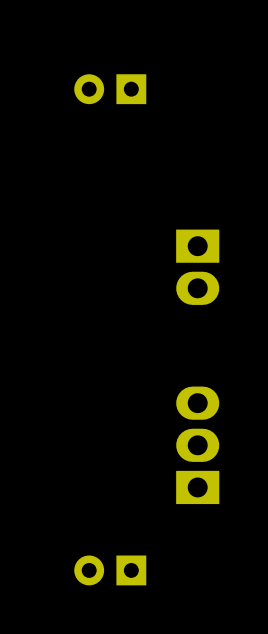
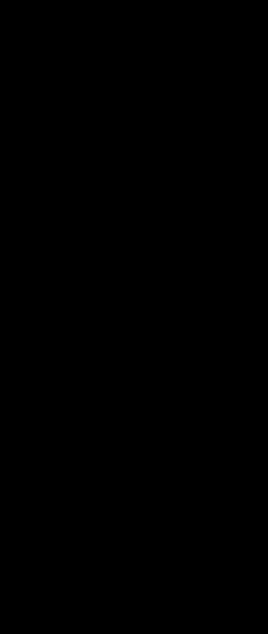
part: (110, 89) -> none
part: (197, 267) -> none
part: (197, 445) -> none
part: (110, 570) -> none

